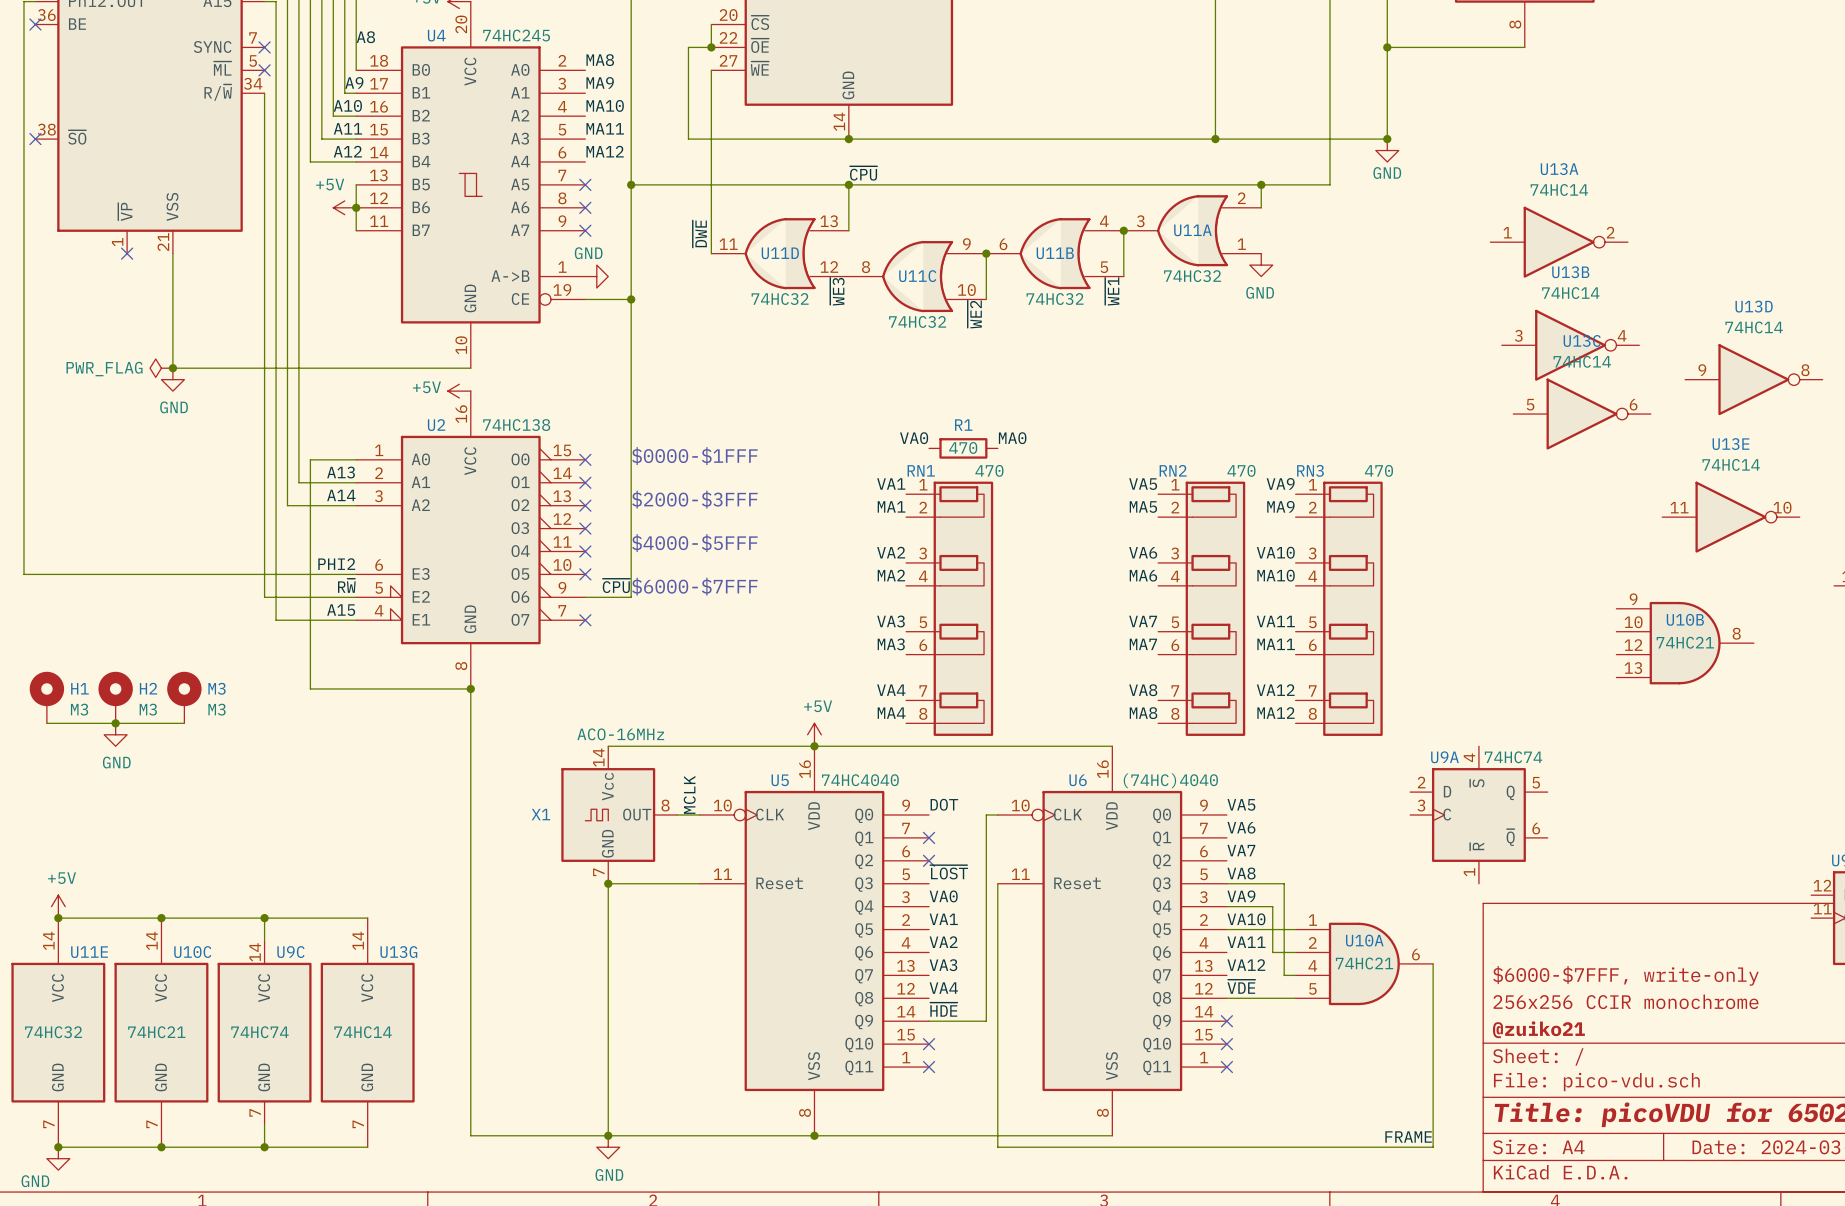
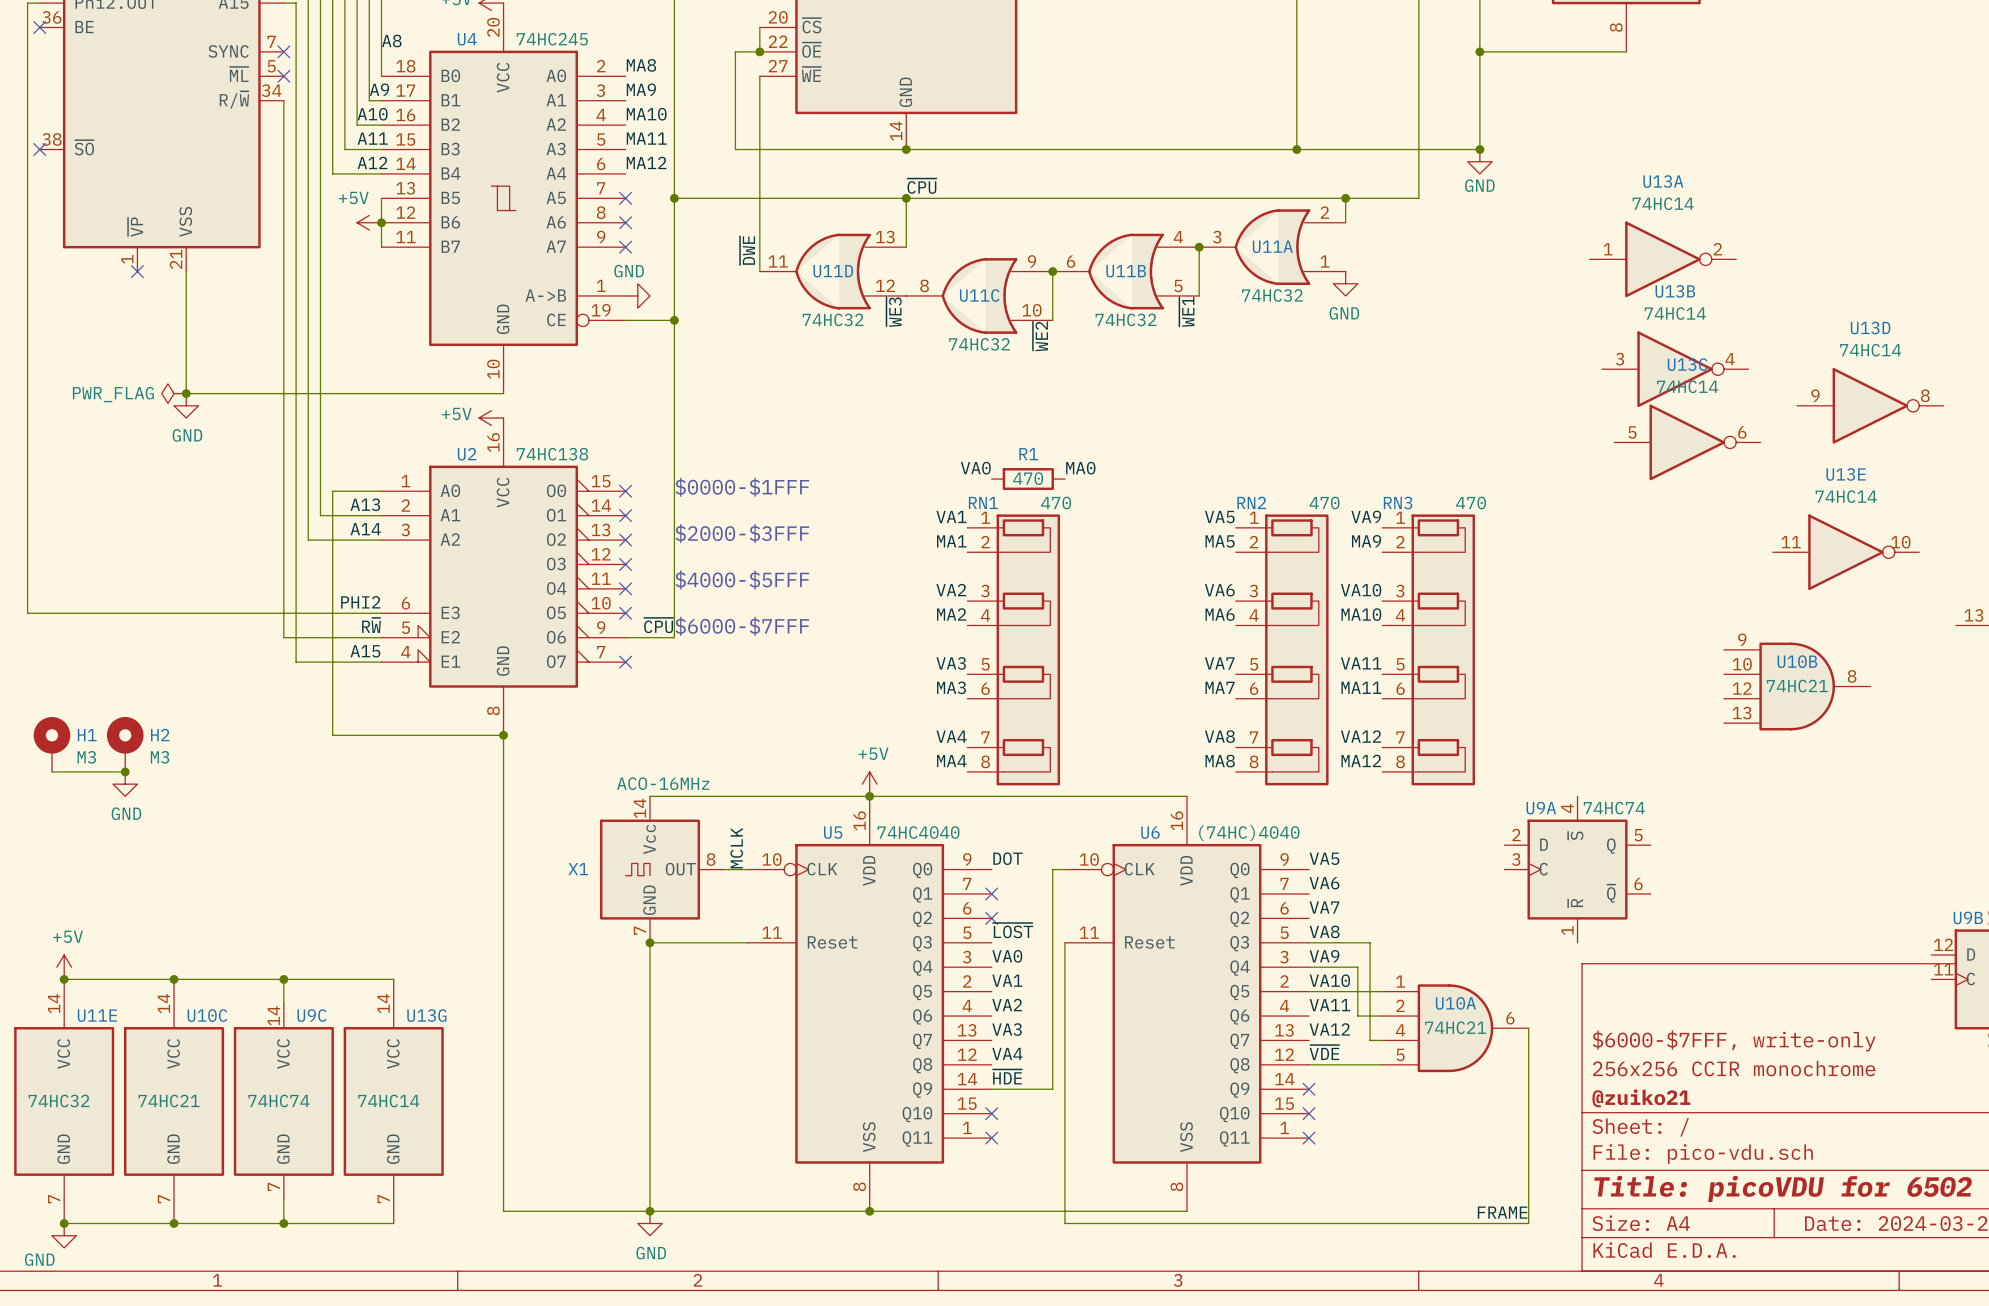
M3: M3 (184, 697) -> none
wire: (115, 723) (184, 723) -> none

